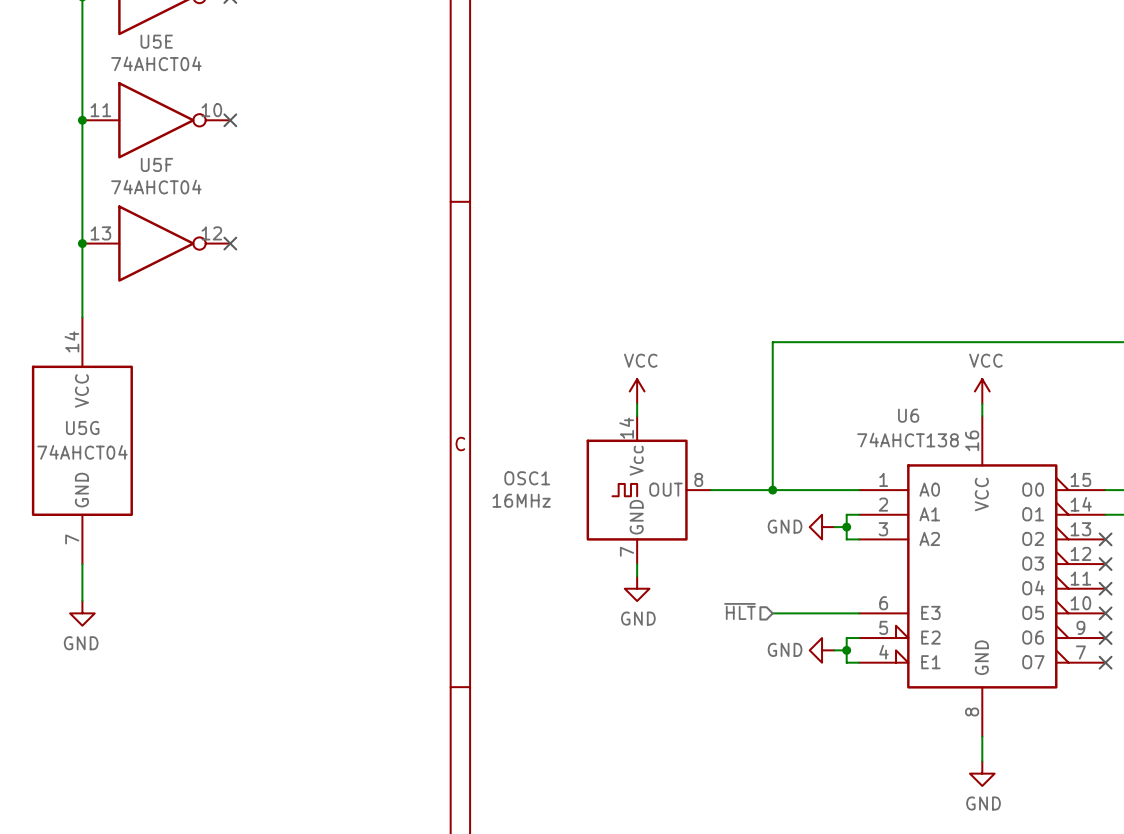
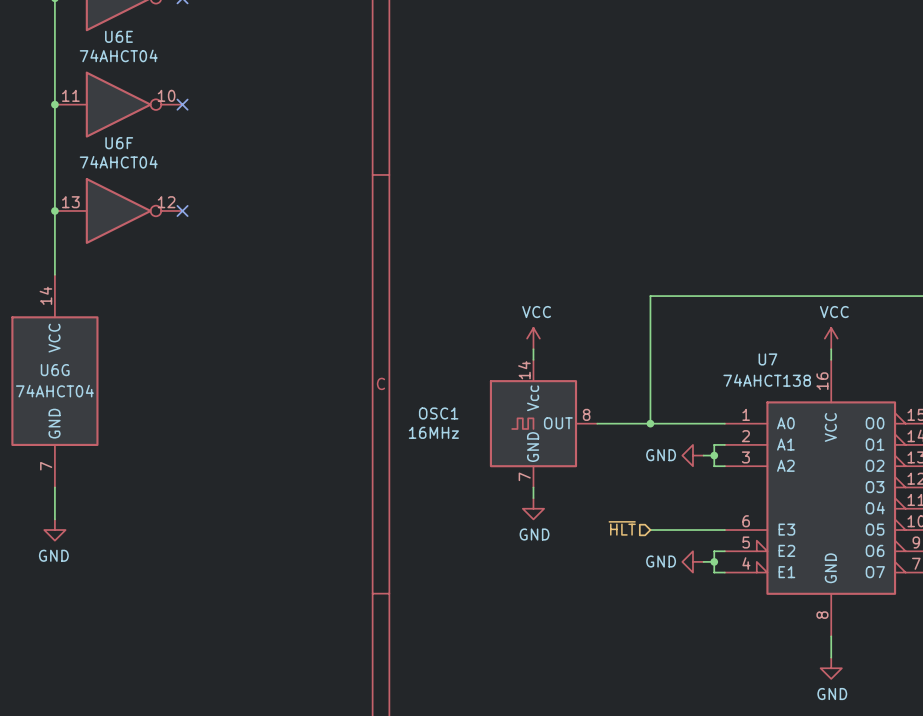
U5E name: U5E (156, 41) -> U6E (118, 36)
U5F name: U5F (156, 164) -> U6F (119, 143)
U6 name: U6 (908, 415) -> U7 (767, 359)
U5G name: U5G (82, 428) -> U6G (55, 370)

